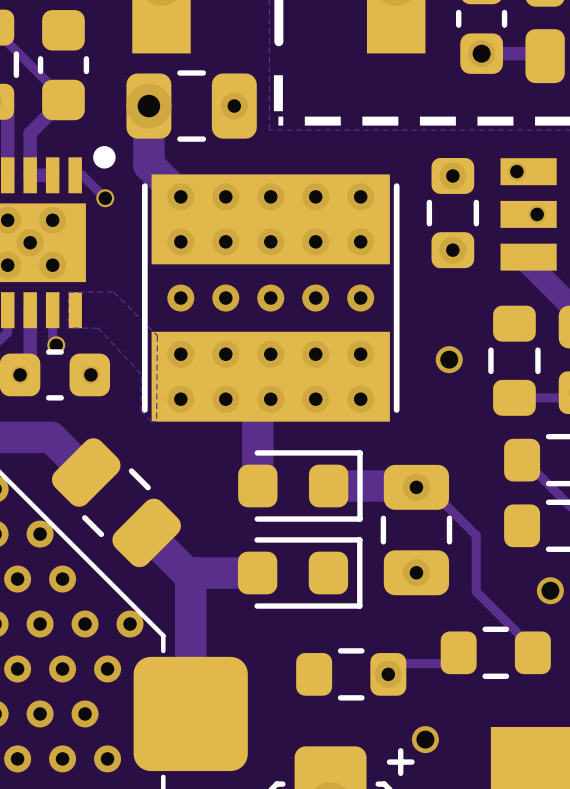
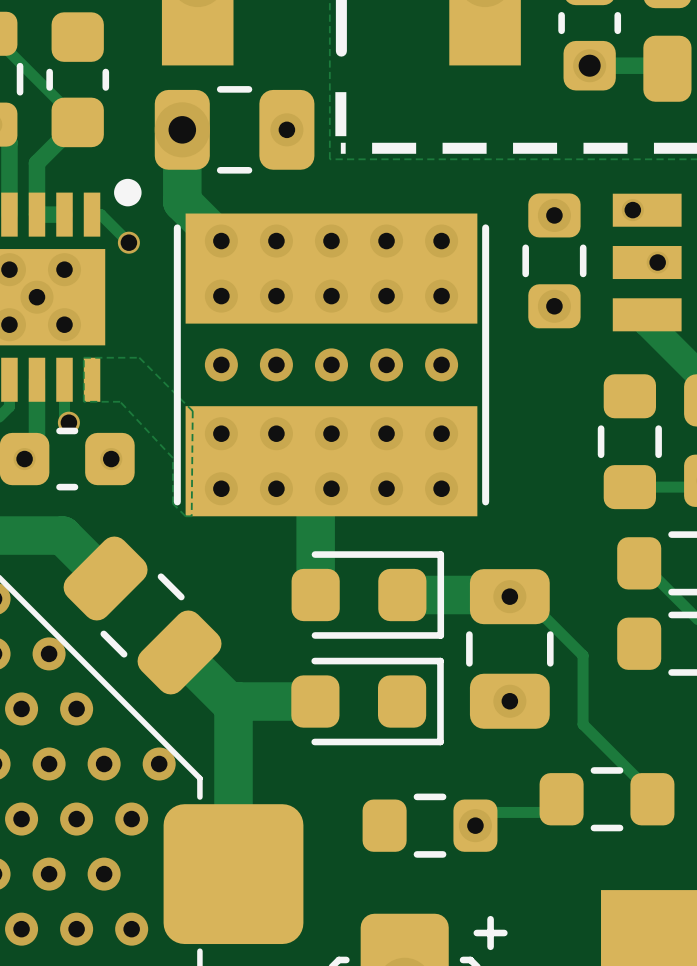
via: (449, 359) -> none
via: (550, 590) -> none
via: (425, 739) -> none

